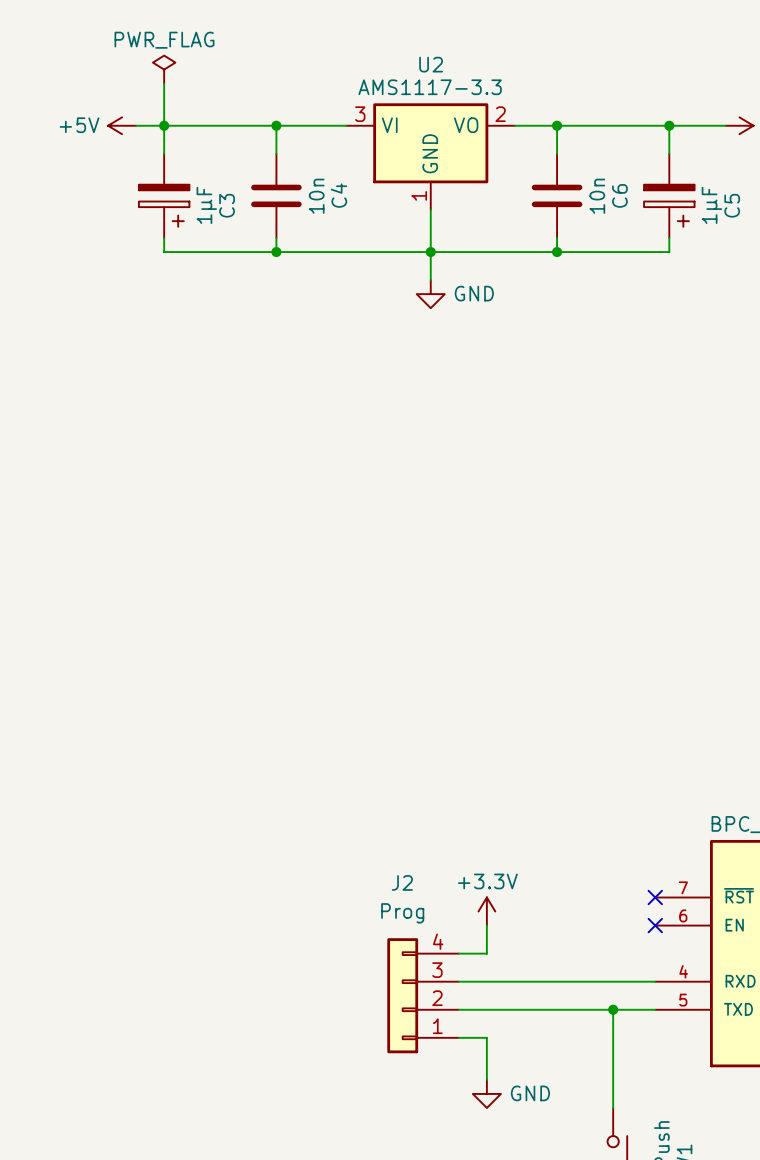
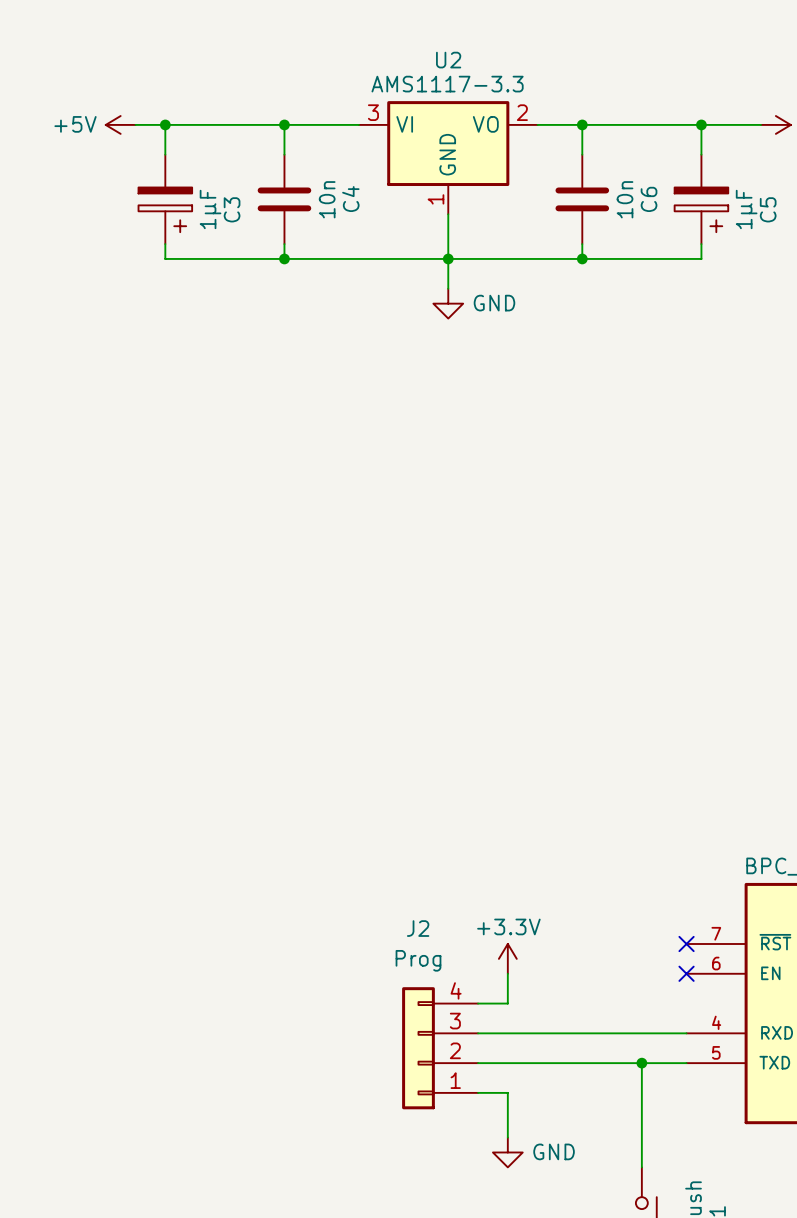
power symbol: PWR_FLAG (164, 69) -> none
wire: (164, 83) (164, 125) -> none

